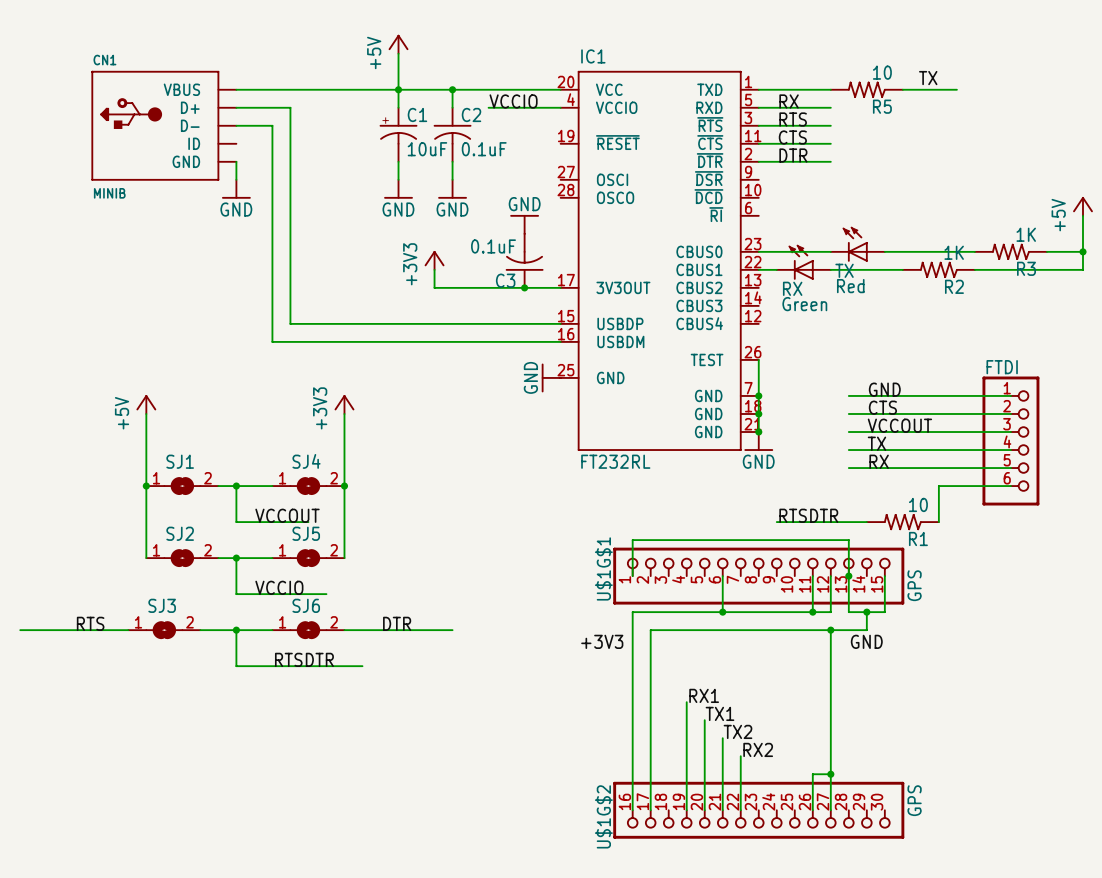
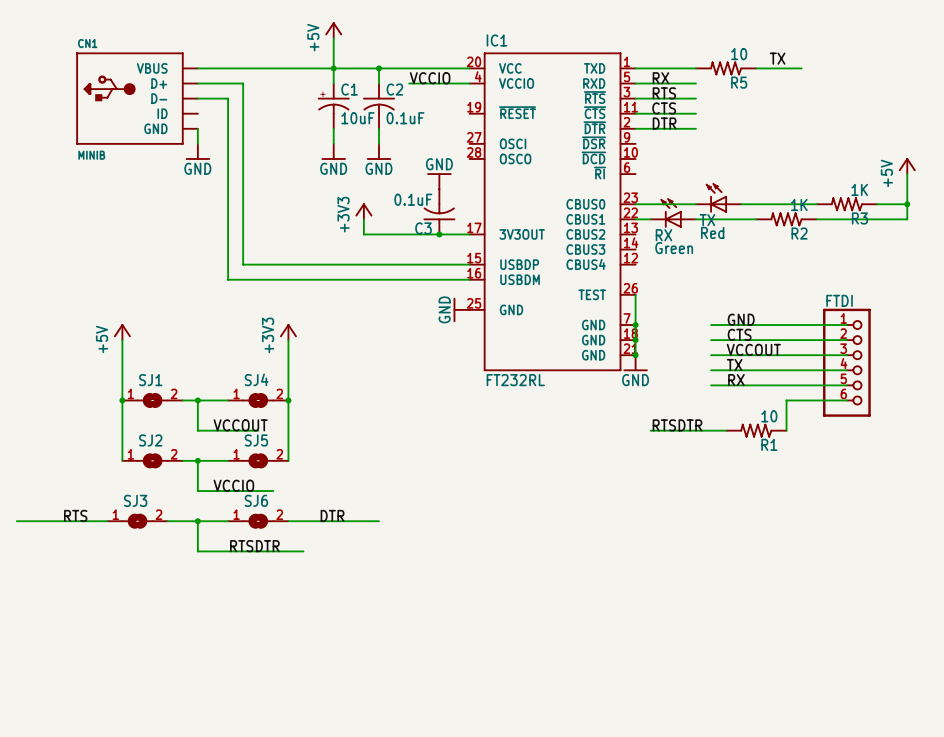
wire: (632, 576) (632, 540) (848, 540) (848, 612) (884, 612) (884, 576) -> none
wire: (722, 576) (722, 612) -> none
U$1G$1: GPS (758, 576) -> none
wire: (812, 576) (812, 612) -> none
wire: (830, 576) (830, 612) (632, 612) (632, 810) -> none
junction: (848, 576) -> none
junction: (722, 612) -> none
junction: (812, 612) -> none
wire: (866, 612) (866, 630) (650, 630) (650, 810) -> none
junction: (866, 612) -> none
wire: (830, 630) (830, 810) -> none
junction: (830, 630) -> none
label: +3V3 (602, 641) -> none
label: GND (866, 641) -> none
label: RX1 (704, 695) -> none
wire: (686, 702) (686, 810) -> none
label: TX1 (719, 713) -> none
wire: (704, 720) (704, 810) -> none
label: TX2 (738, 731) -> none
wire: (722, 738) (722, 810) -> none
label: RX2 (758, 749) -> none
wire: (740, 756) (740, 810) -> none
wire: (830, 774) (812, 774) (812, 810) -> none
junction: (830, 774) -> none
U$1G$2: GPS (758, 810) -> none

